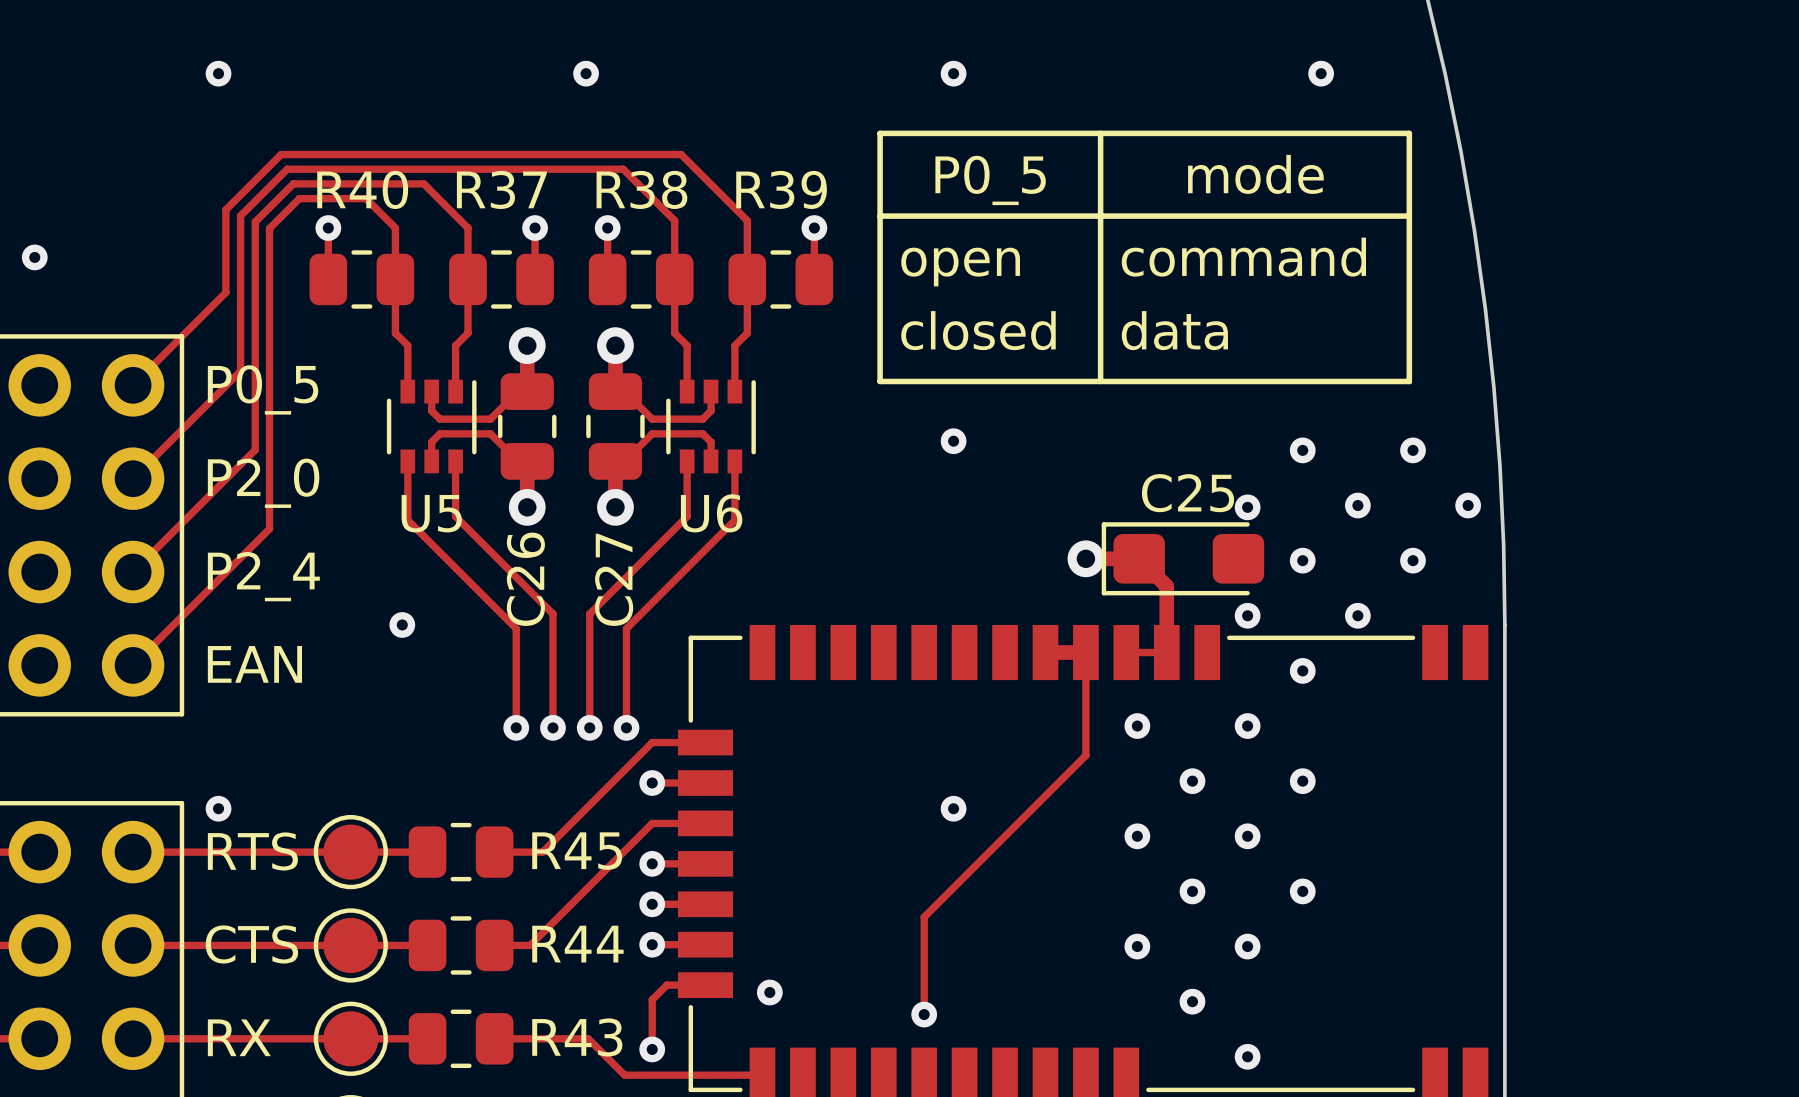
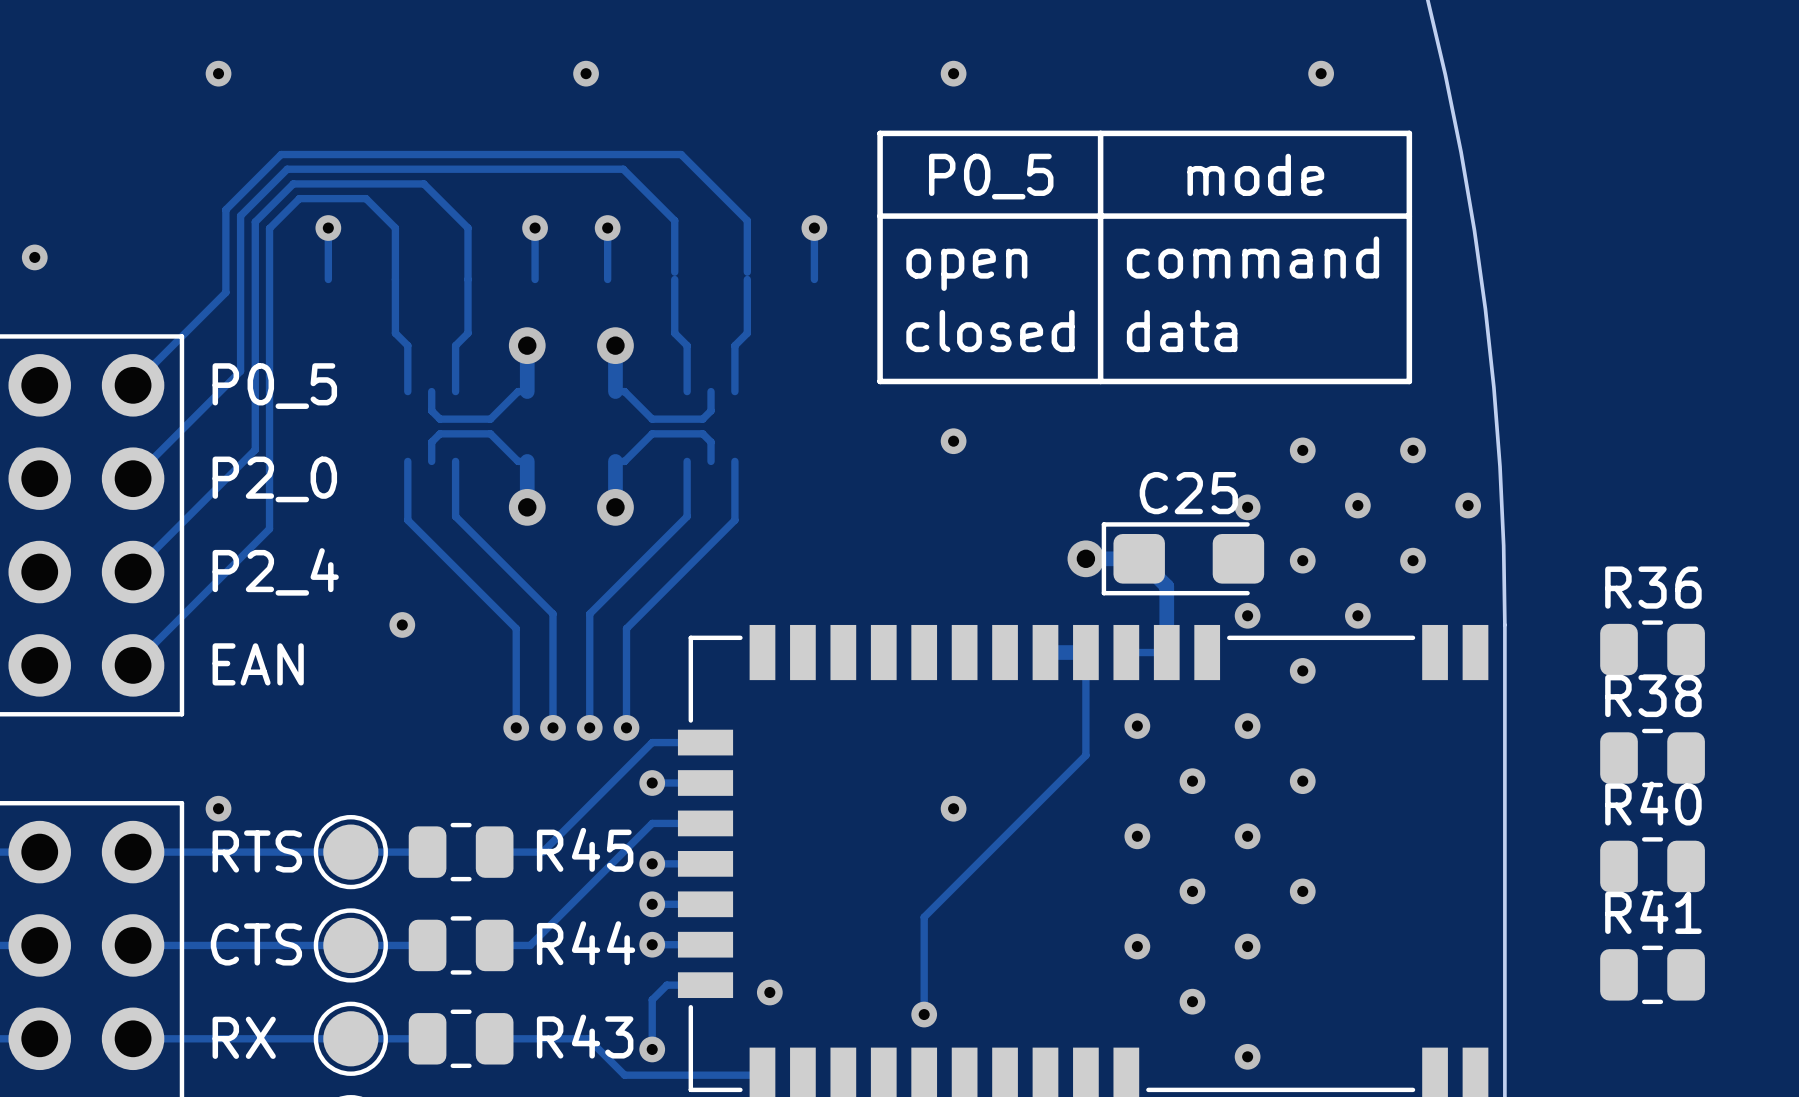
R40 name position: R40 (362, 189) -> R40 (1653, 803)
R38 name position: R38 (641, 189) -> R38 (1653, 695)
R40 position: (361, 279) -> (1652, 866)
R37: (501, 279) -> none
R38 position: (641, 279) -> (1652, 758)
R39: (780, 279) -> none
U5: (431, 426) -> none
C26: (527, 426) -> none
C27: (615, 426) -> none
U6: (711, 426) -> none
R36: none -> (1652, 649)
R41: none -> (1652, 974)

